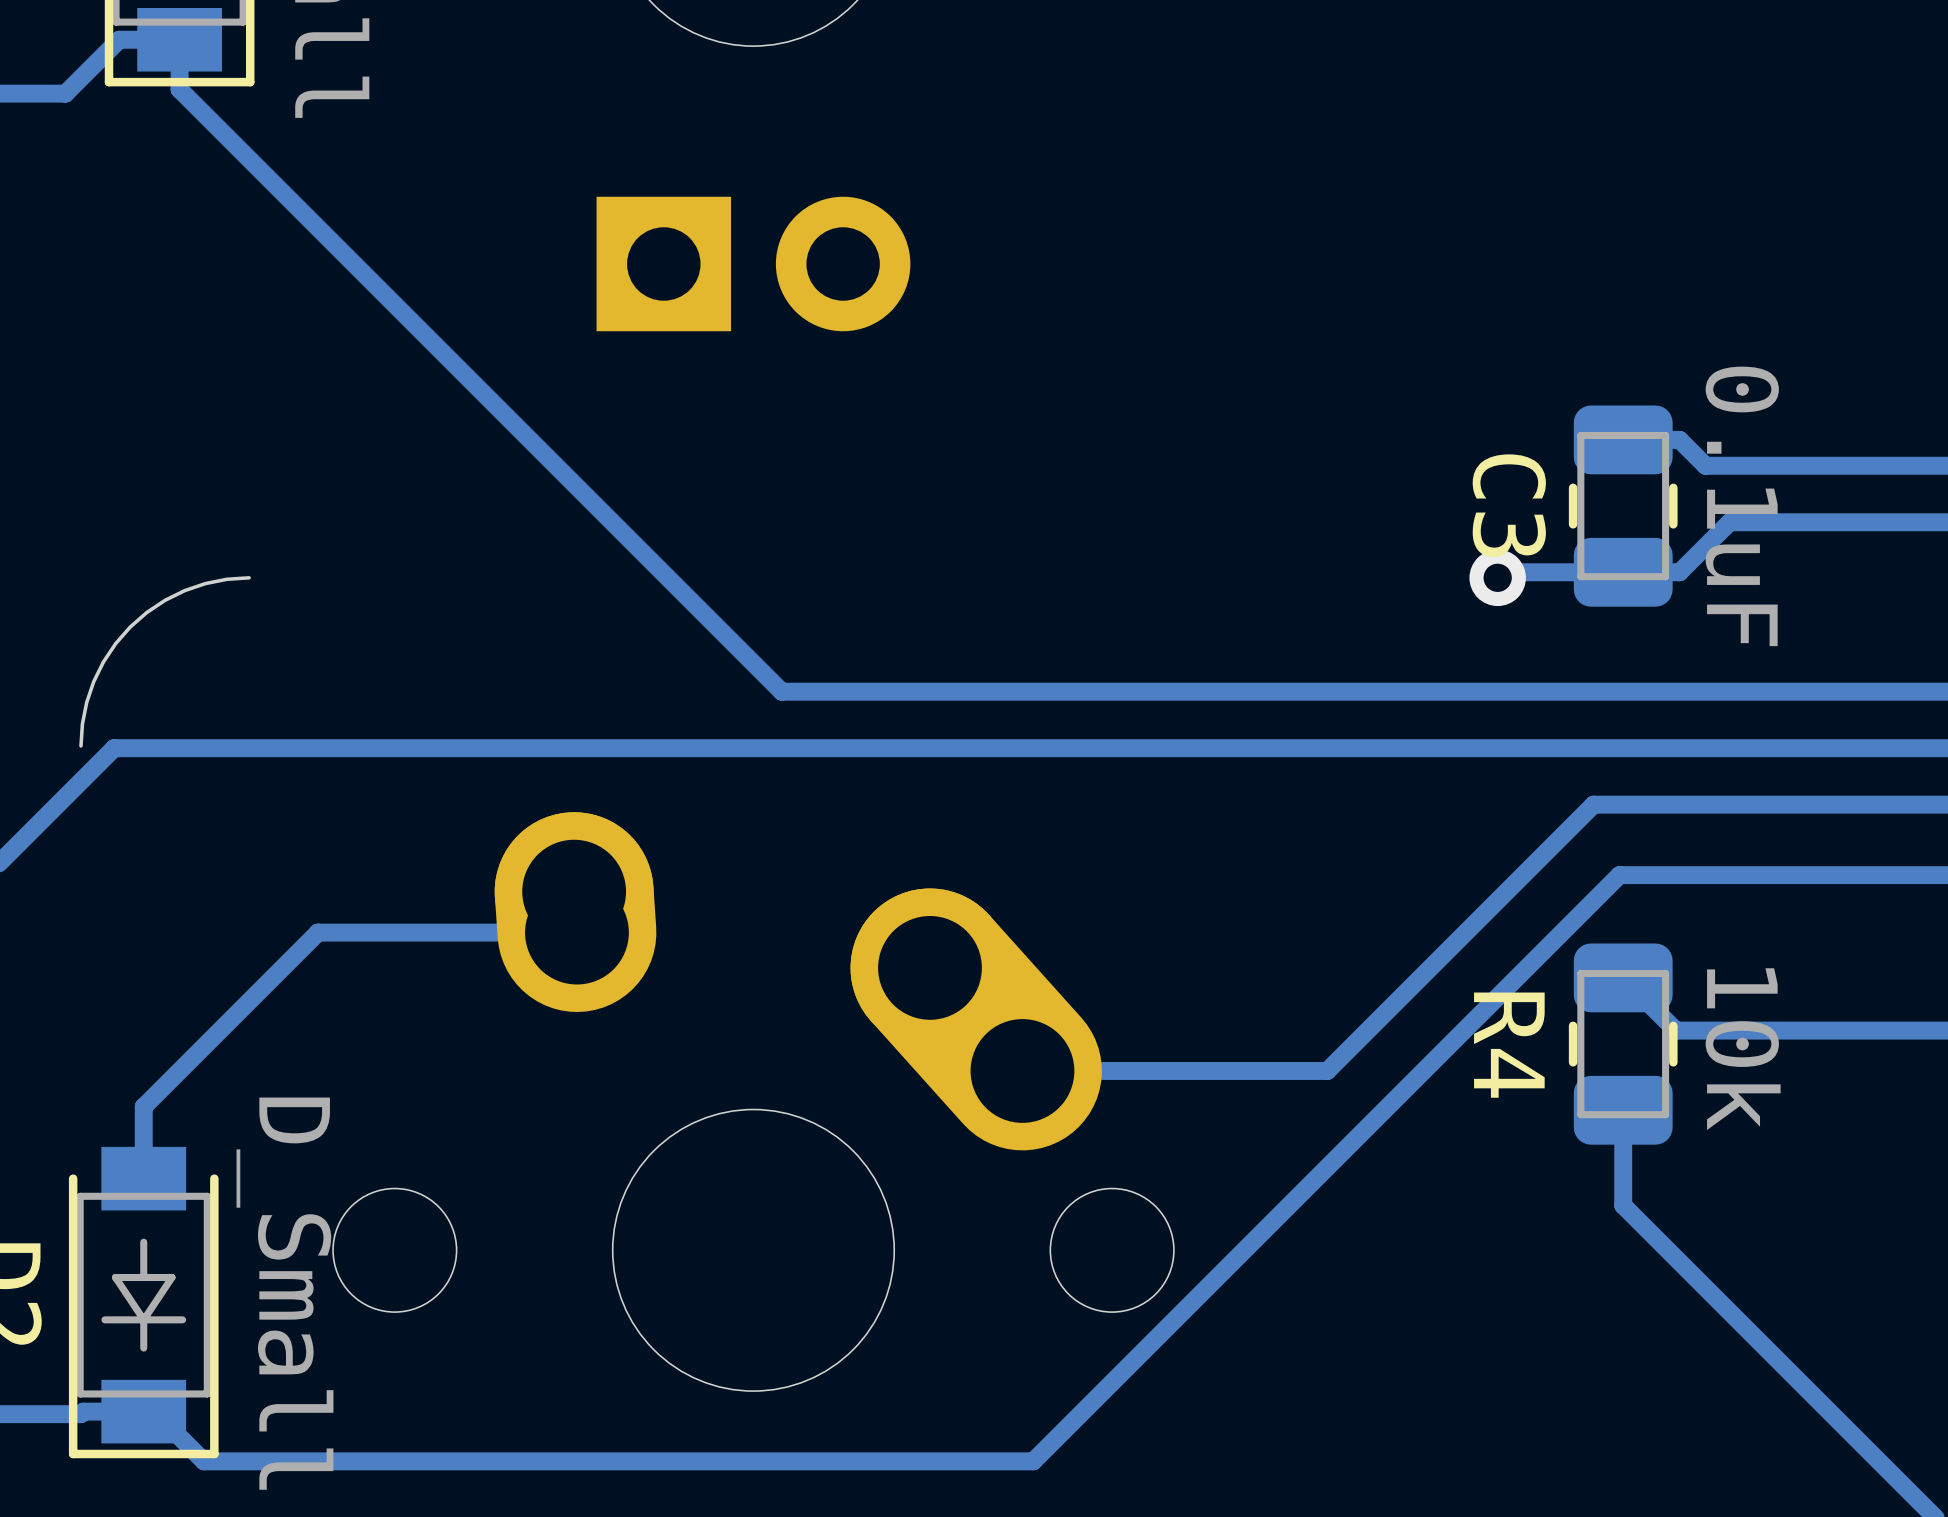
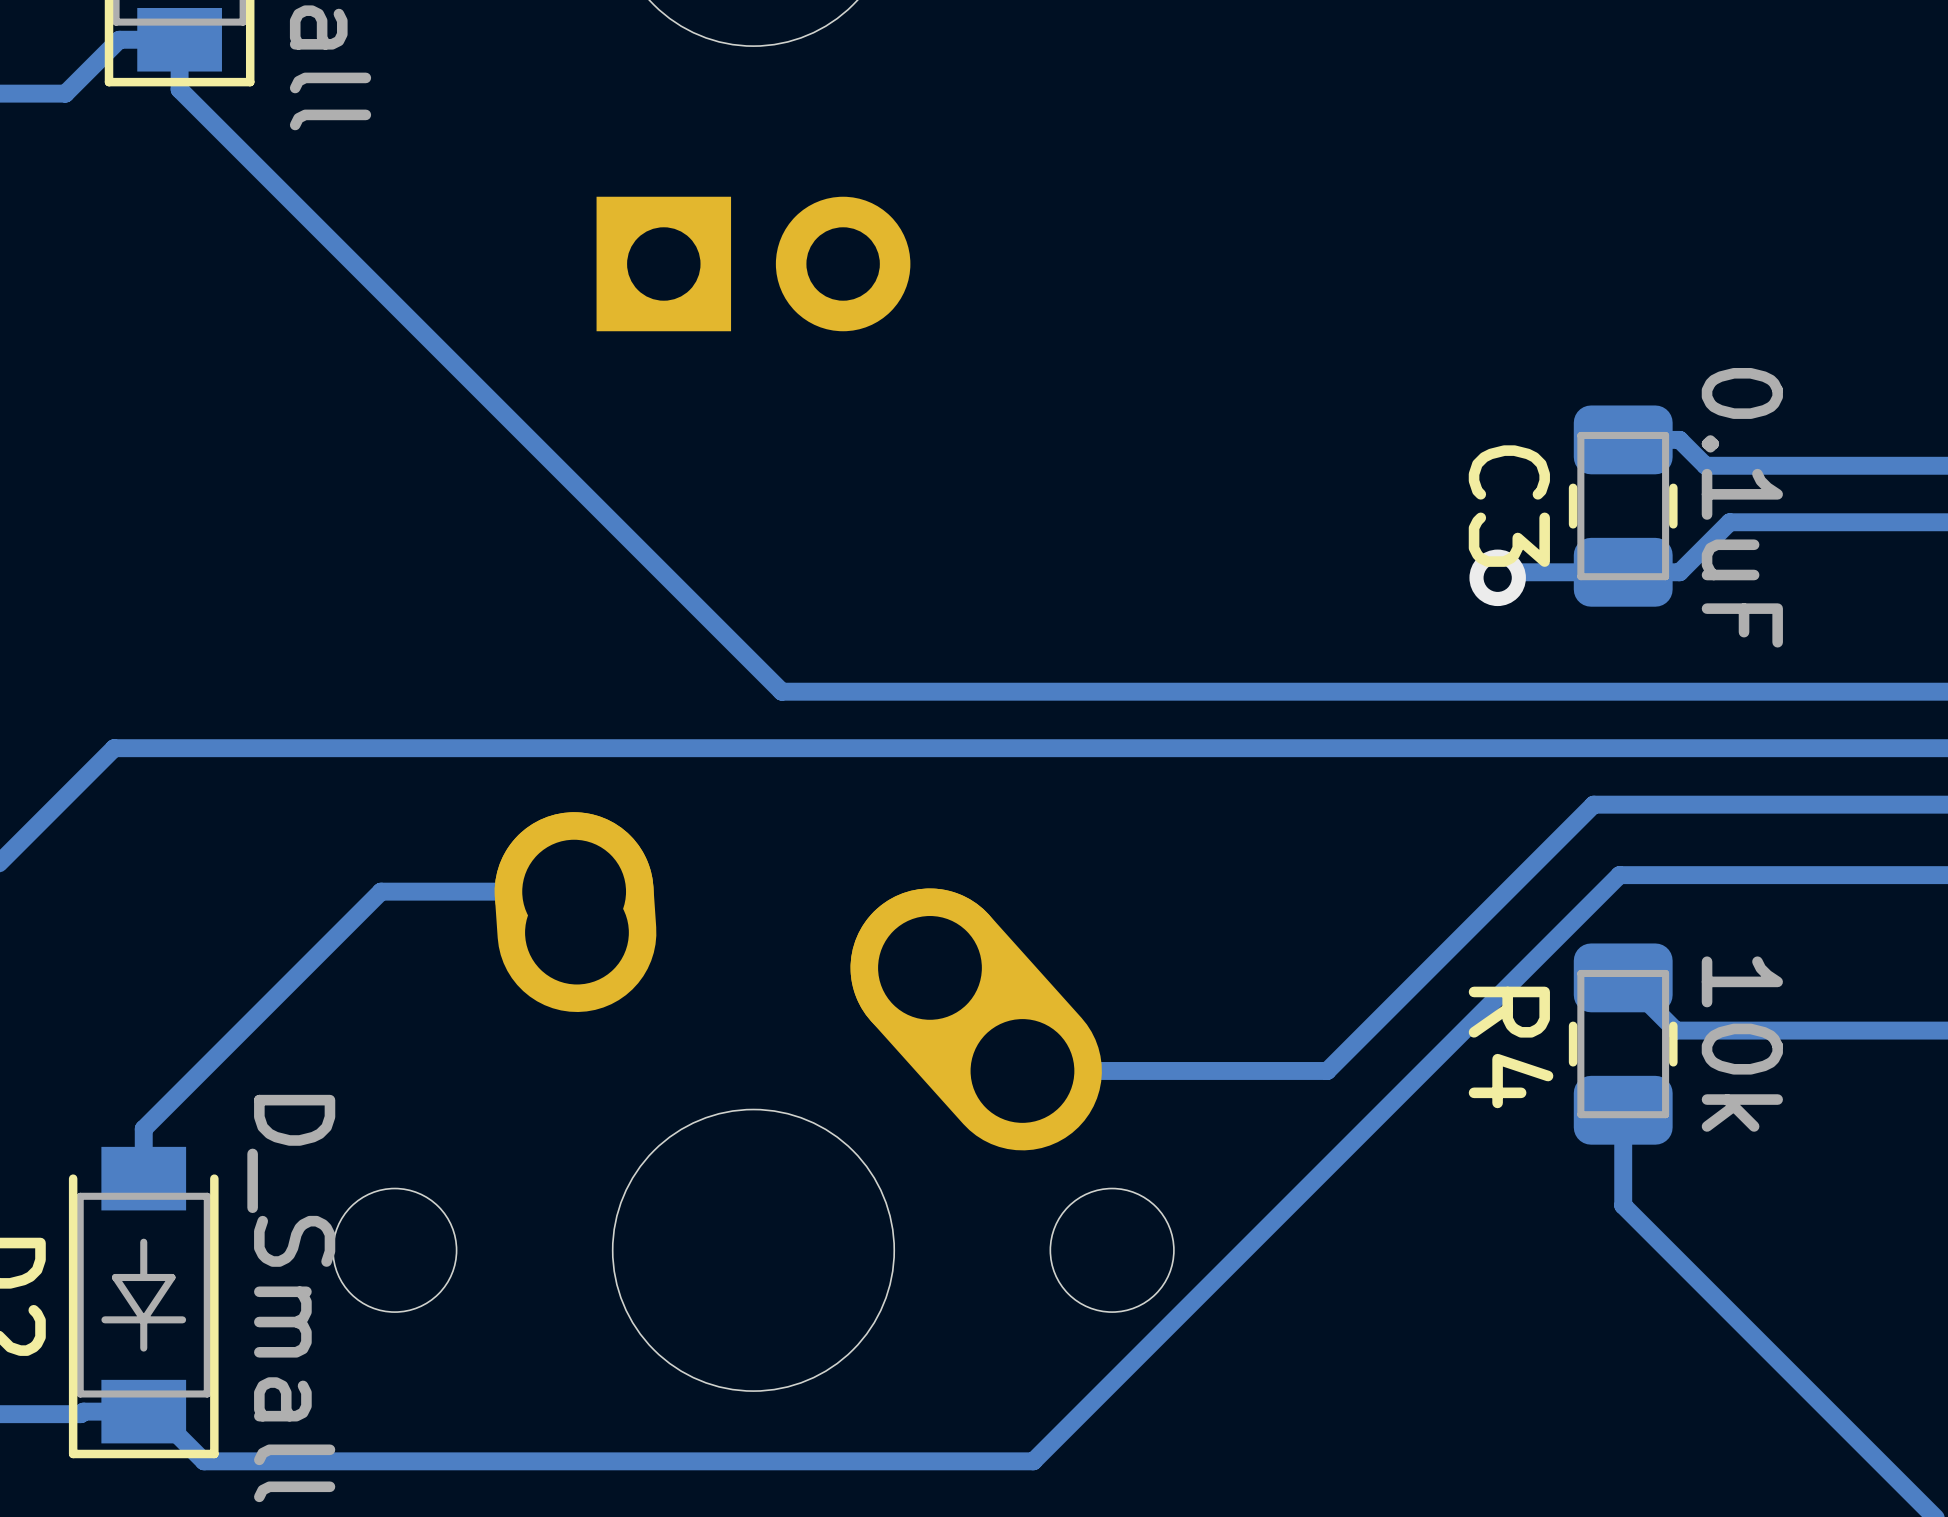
board edge: (249, 577) (227, 579) (184, 590) (146, 612) (130, 627) (103, 661) (93, 681) (82, 723) (80, 745) -> none
track: (576, 932) (317, 932) (143, 1106) (143, 1128) -> (576, 932) (576, 894) (574, 891) (381, 891) (143, 1128)

